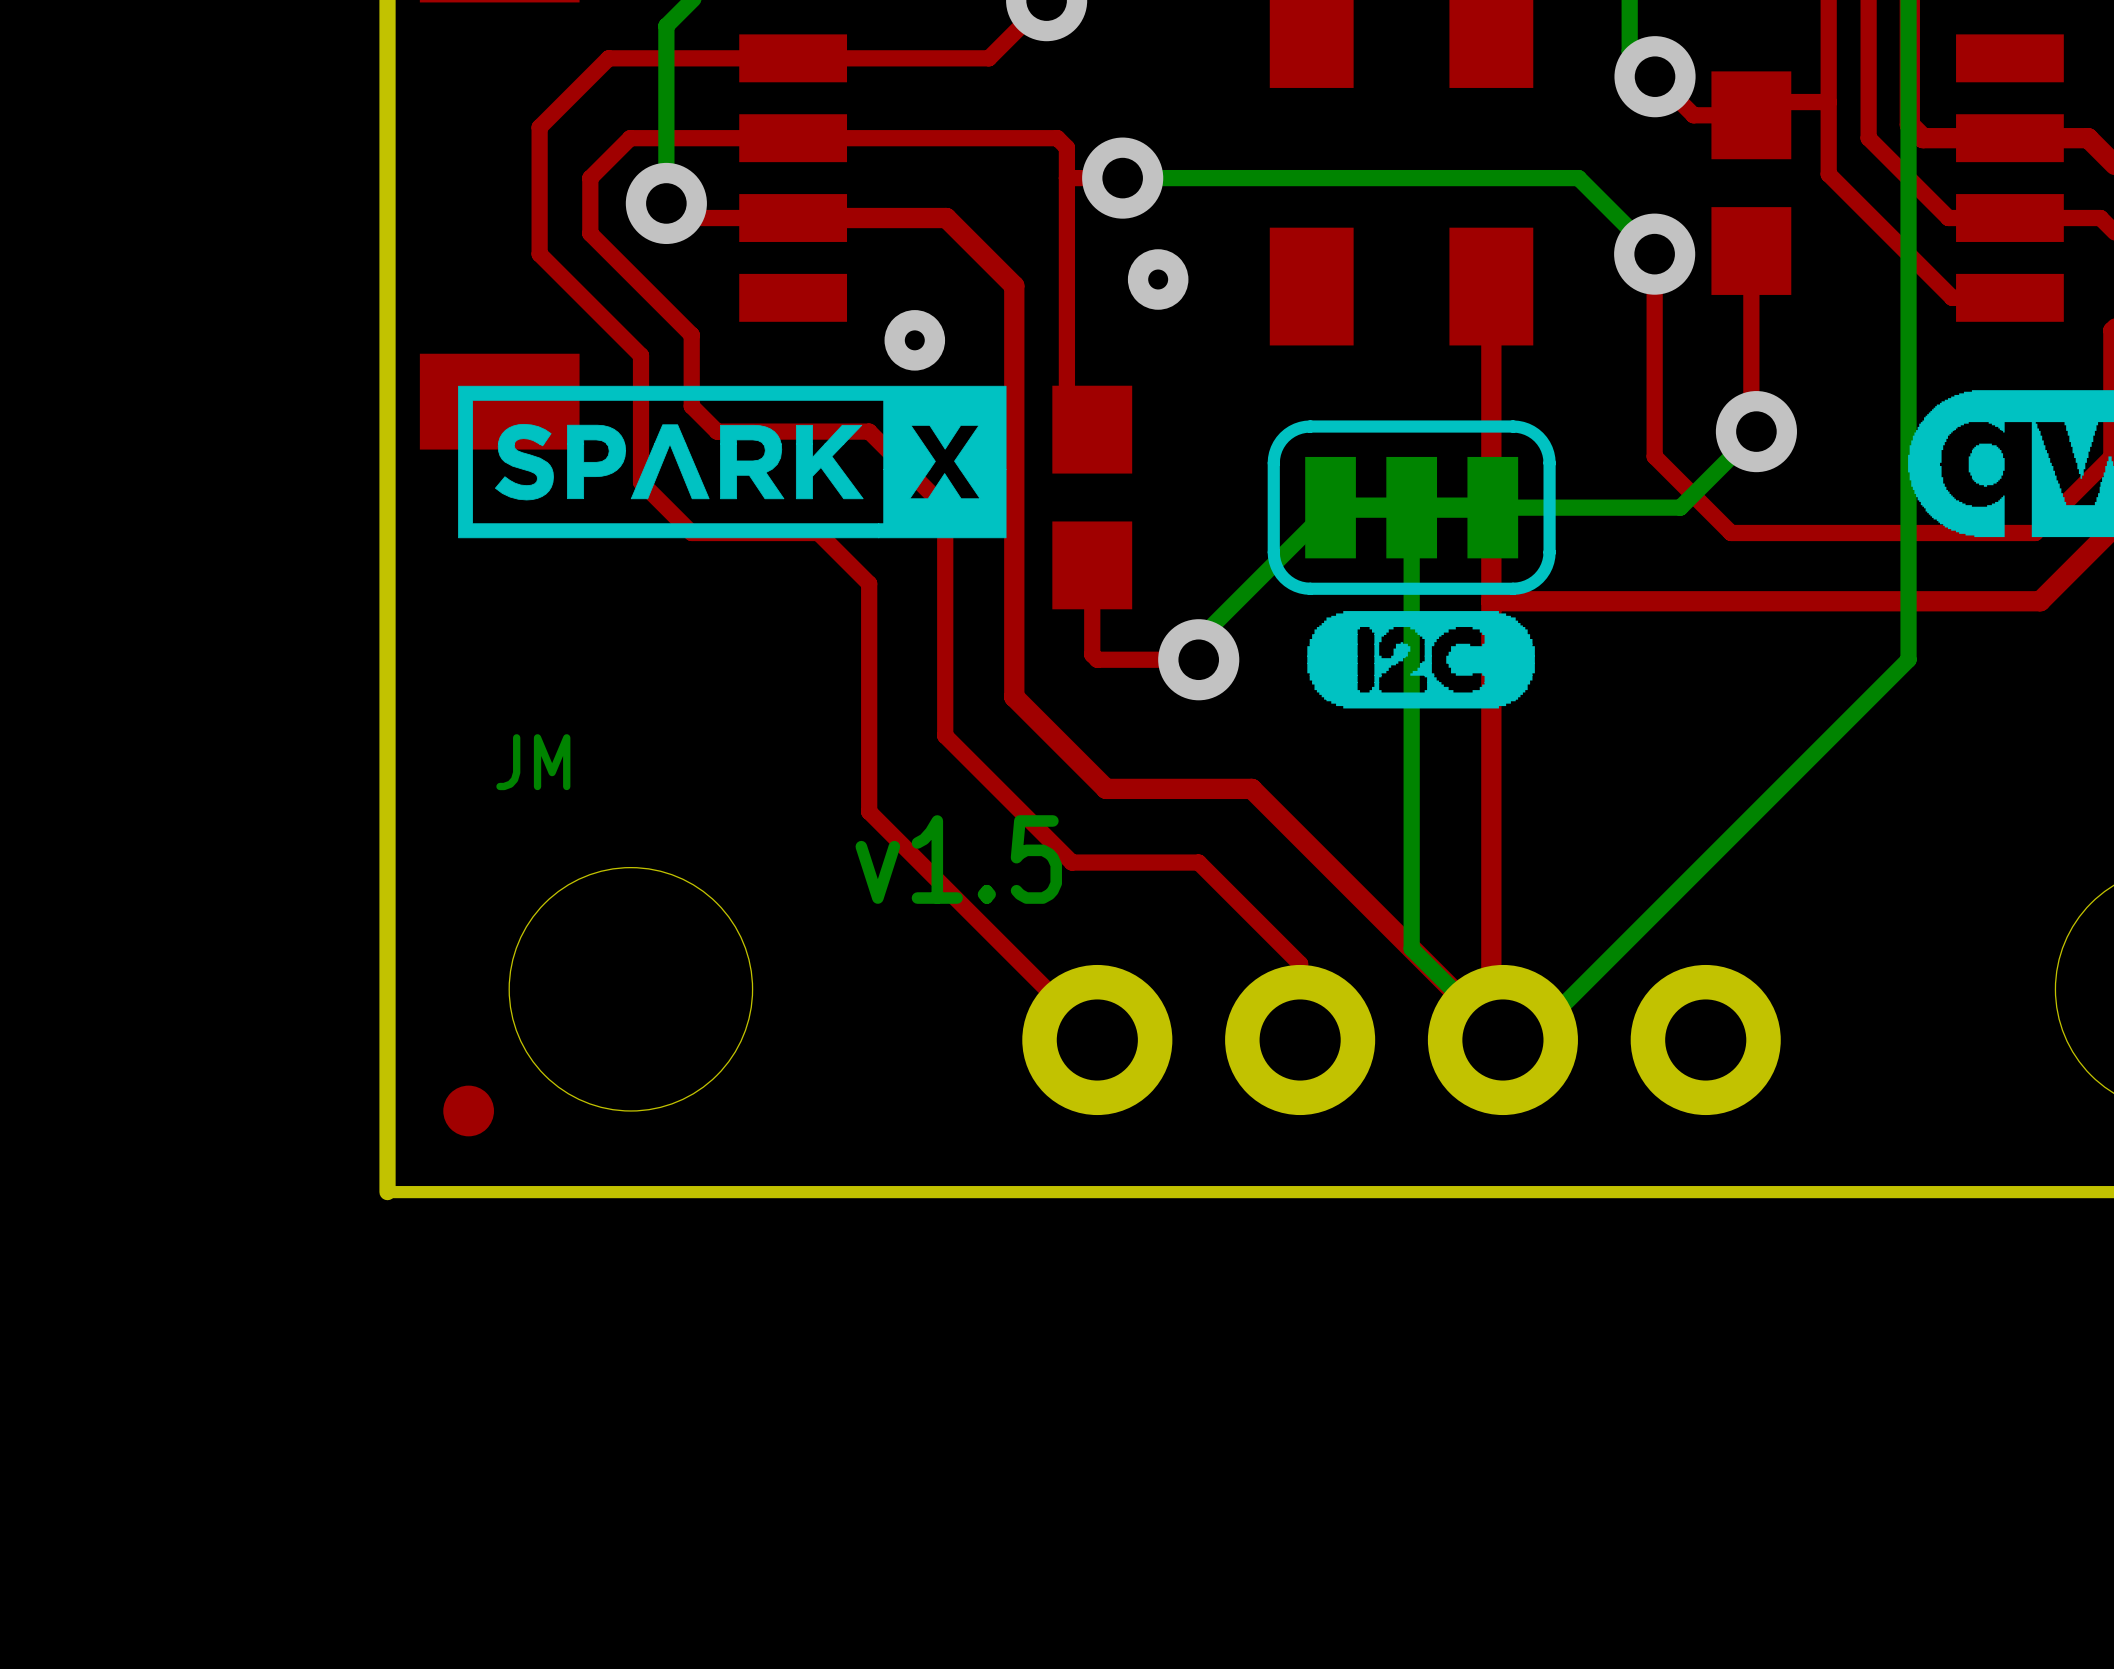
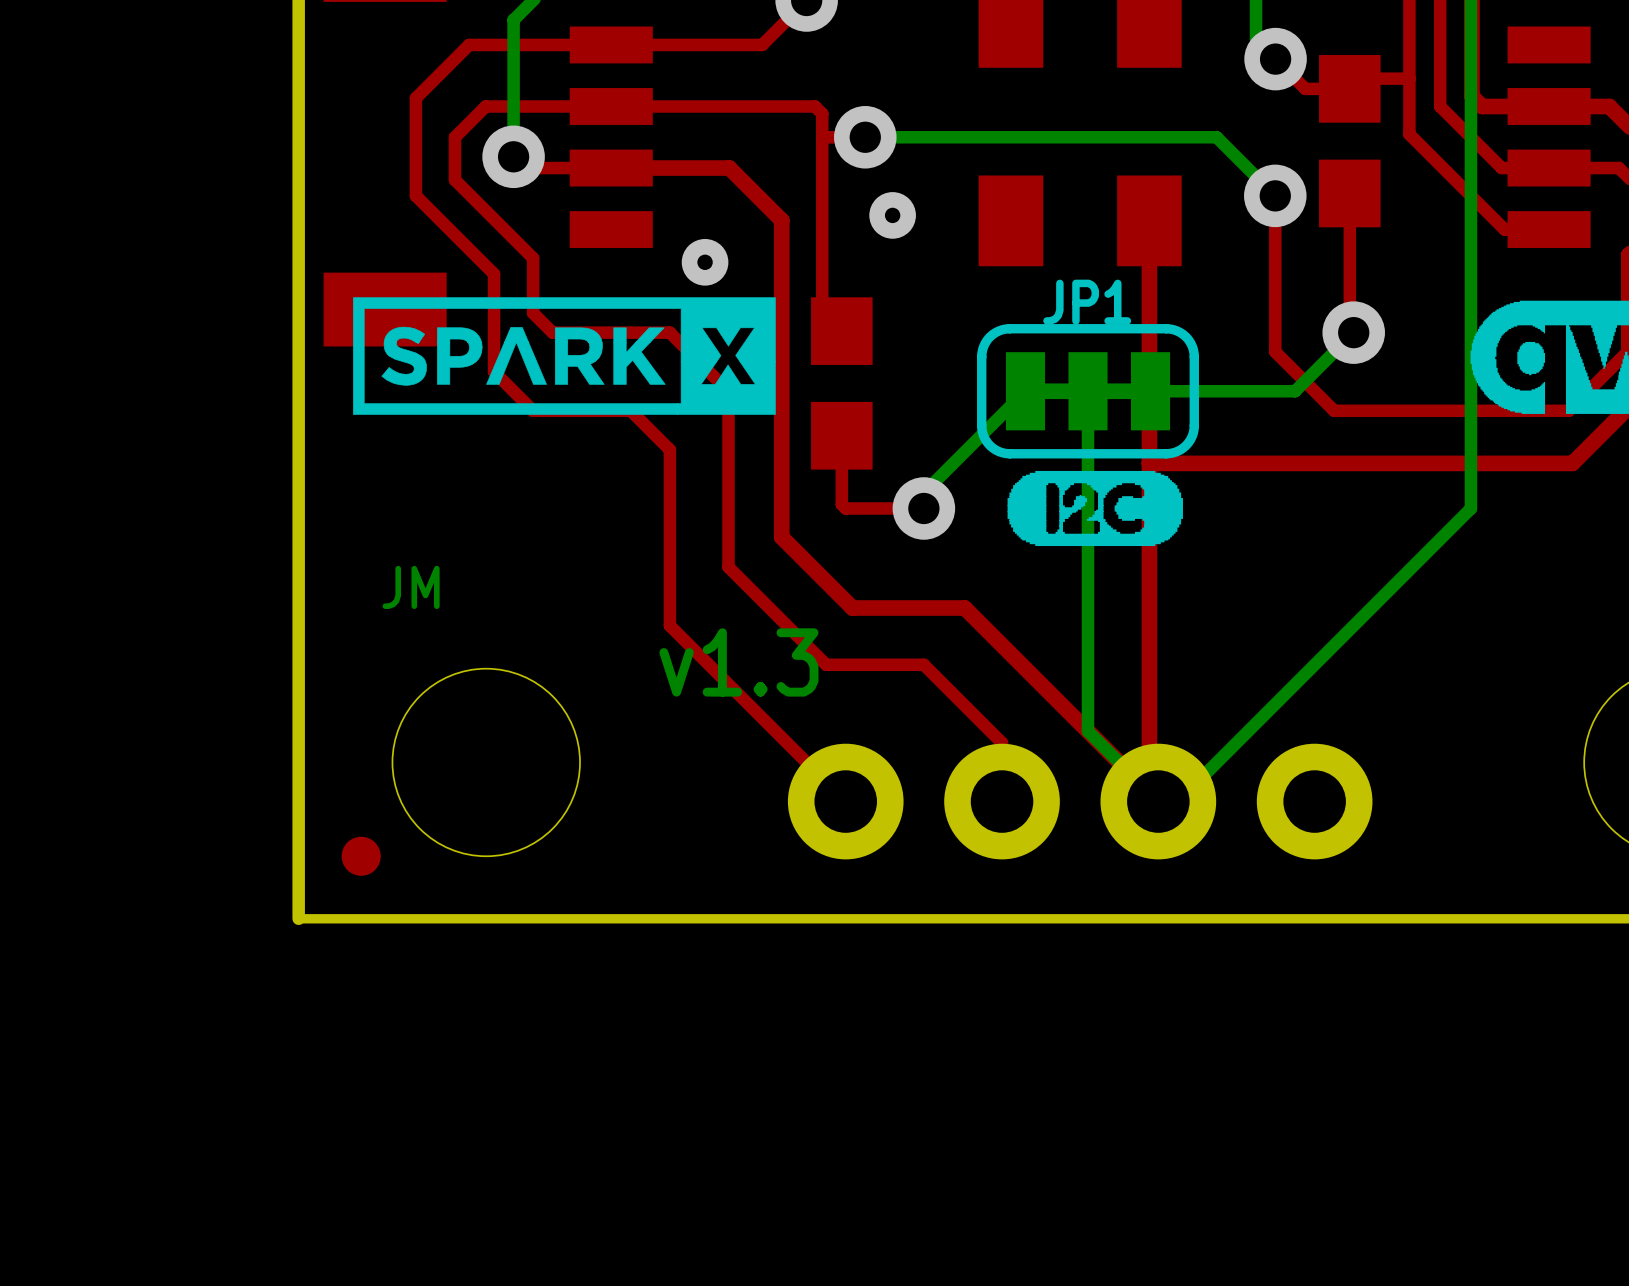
JP1 name: none -> JP1 (1087, 302)
text: v1.5 (958, 859) -> v1.3 (738, 662)

